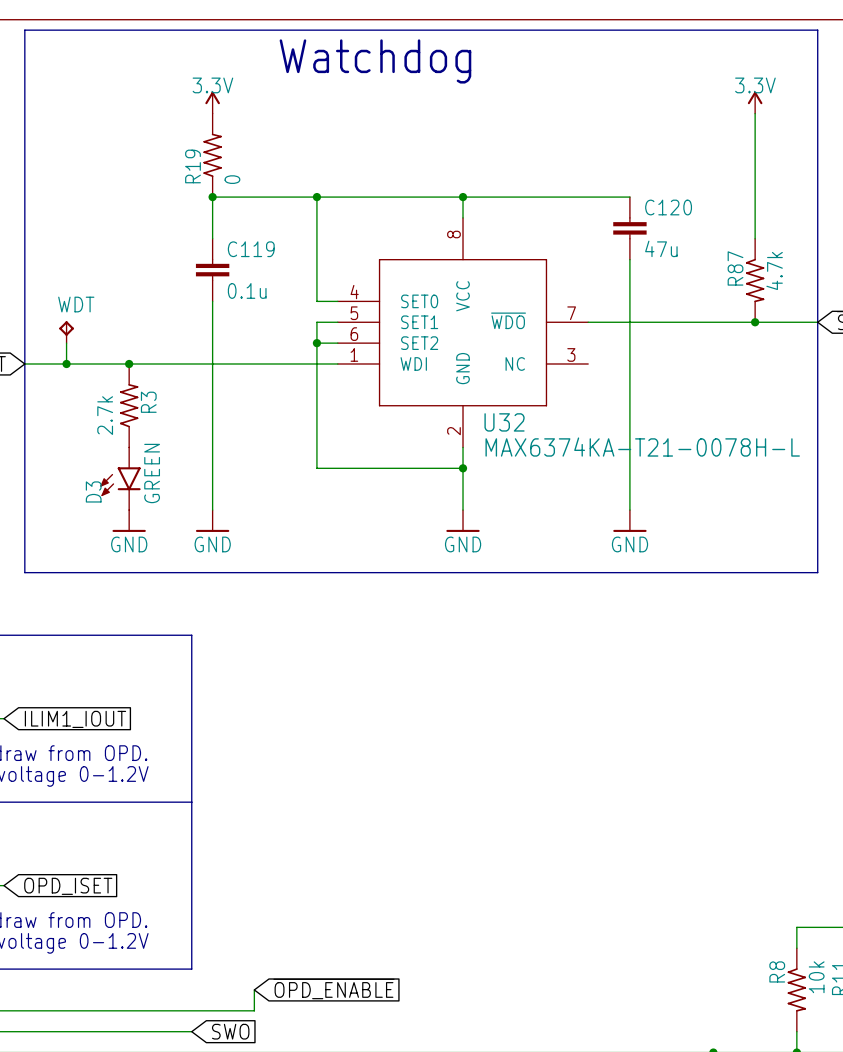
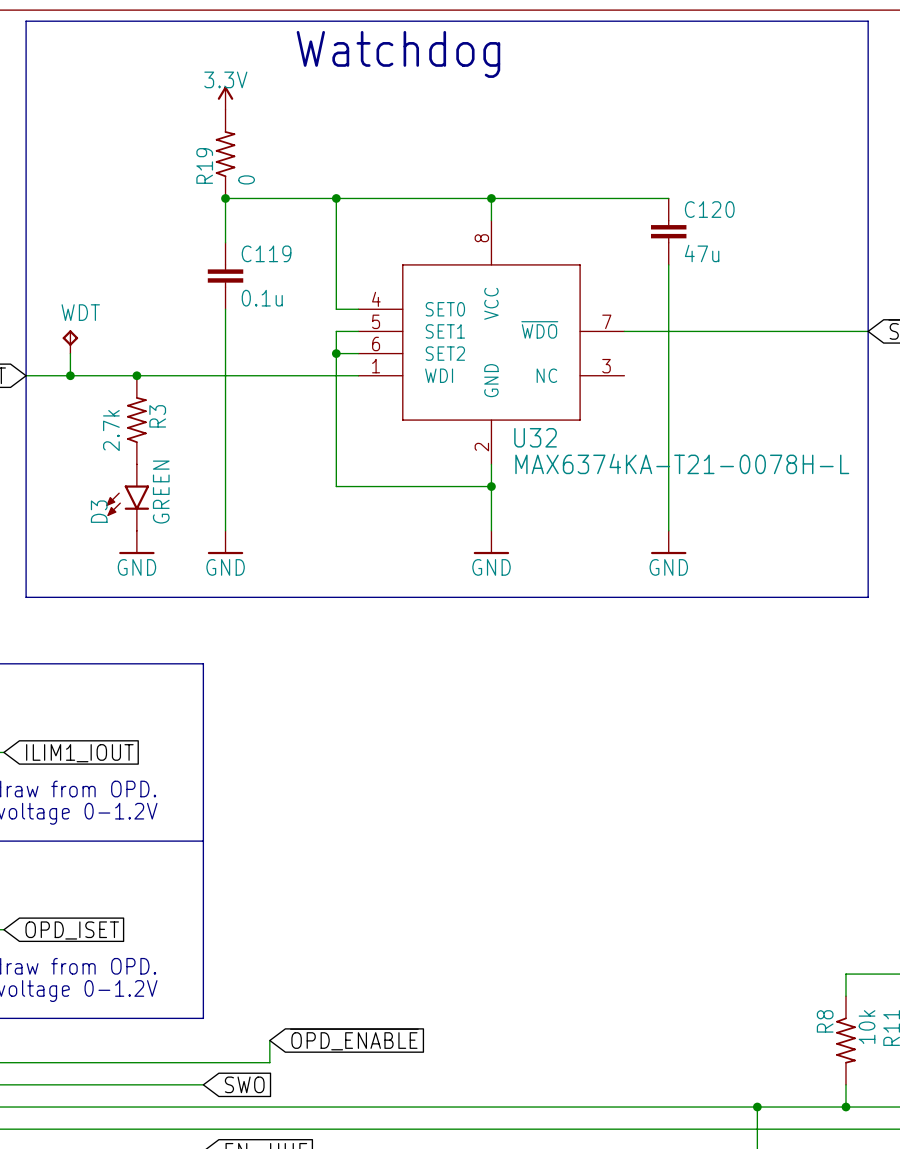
power symbol: 3.3V (755, 102) -> none
wire: (755, 113) (755, 238) -> none
R87: 4.7k (755, 280) -> none
junction: (755, 322) -> none

